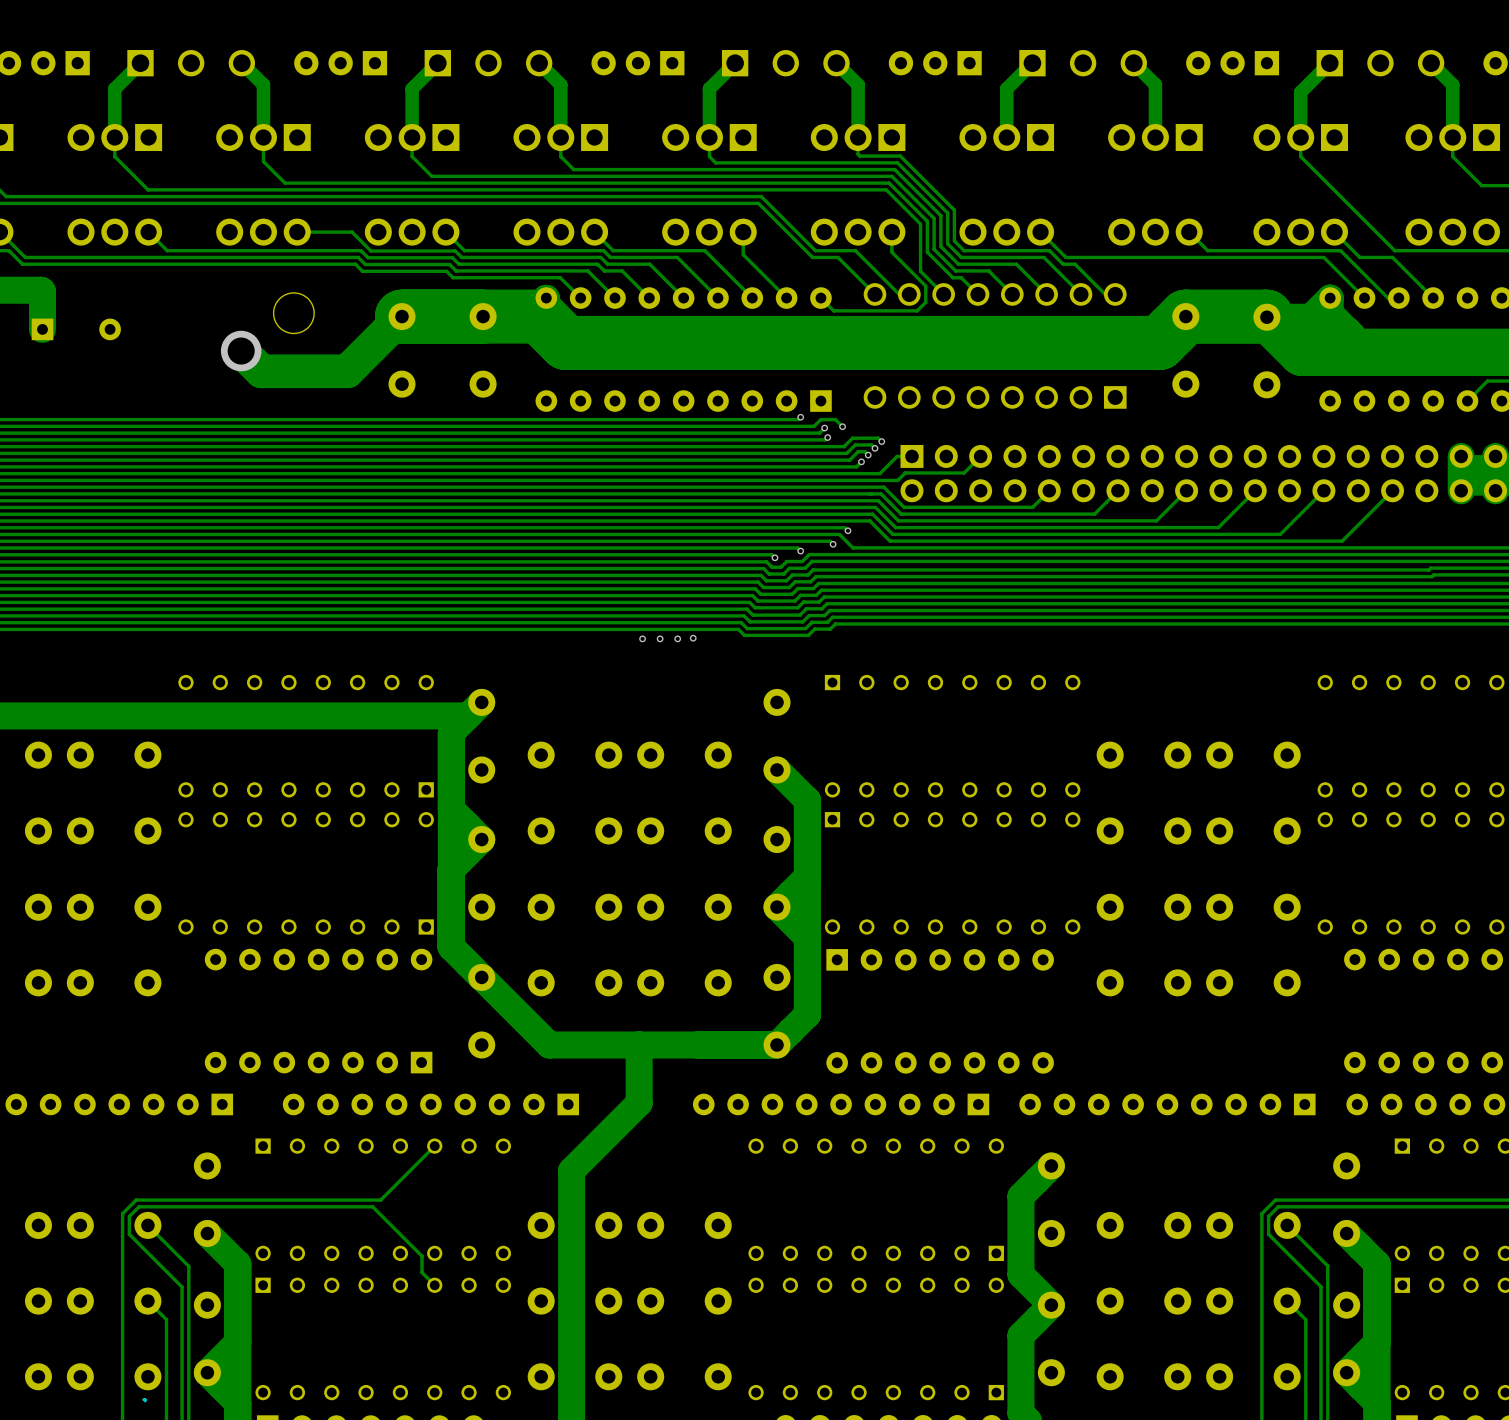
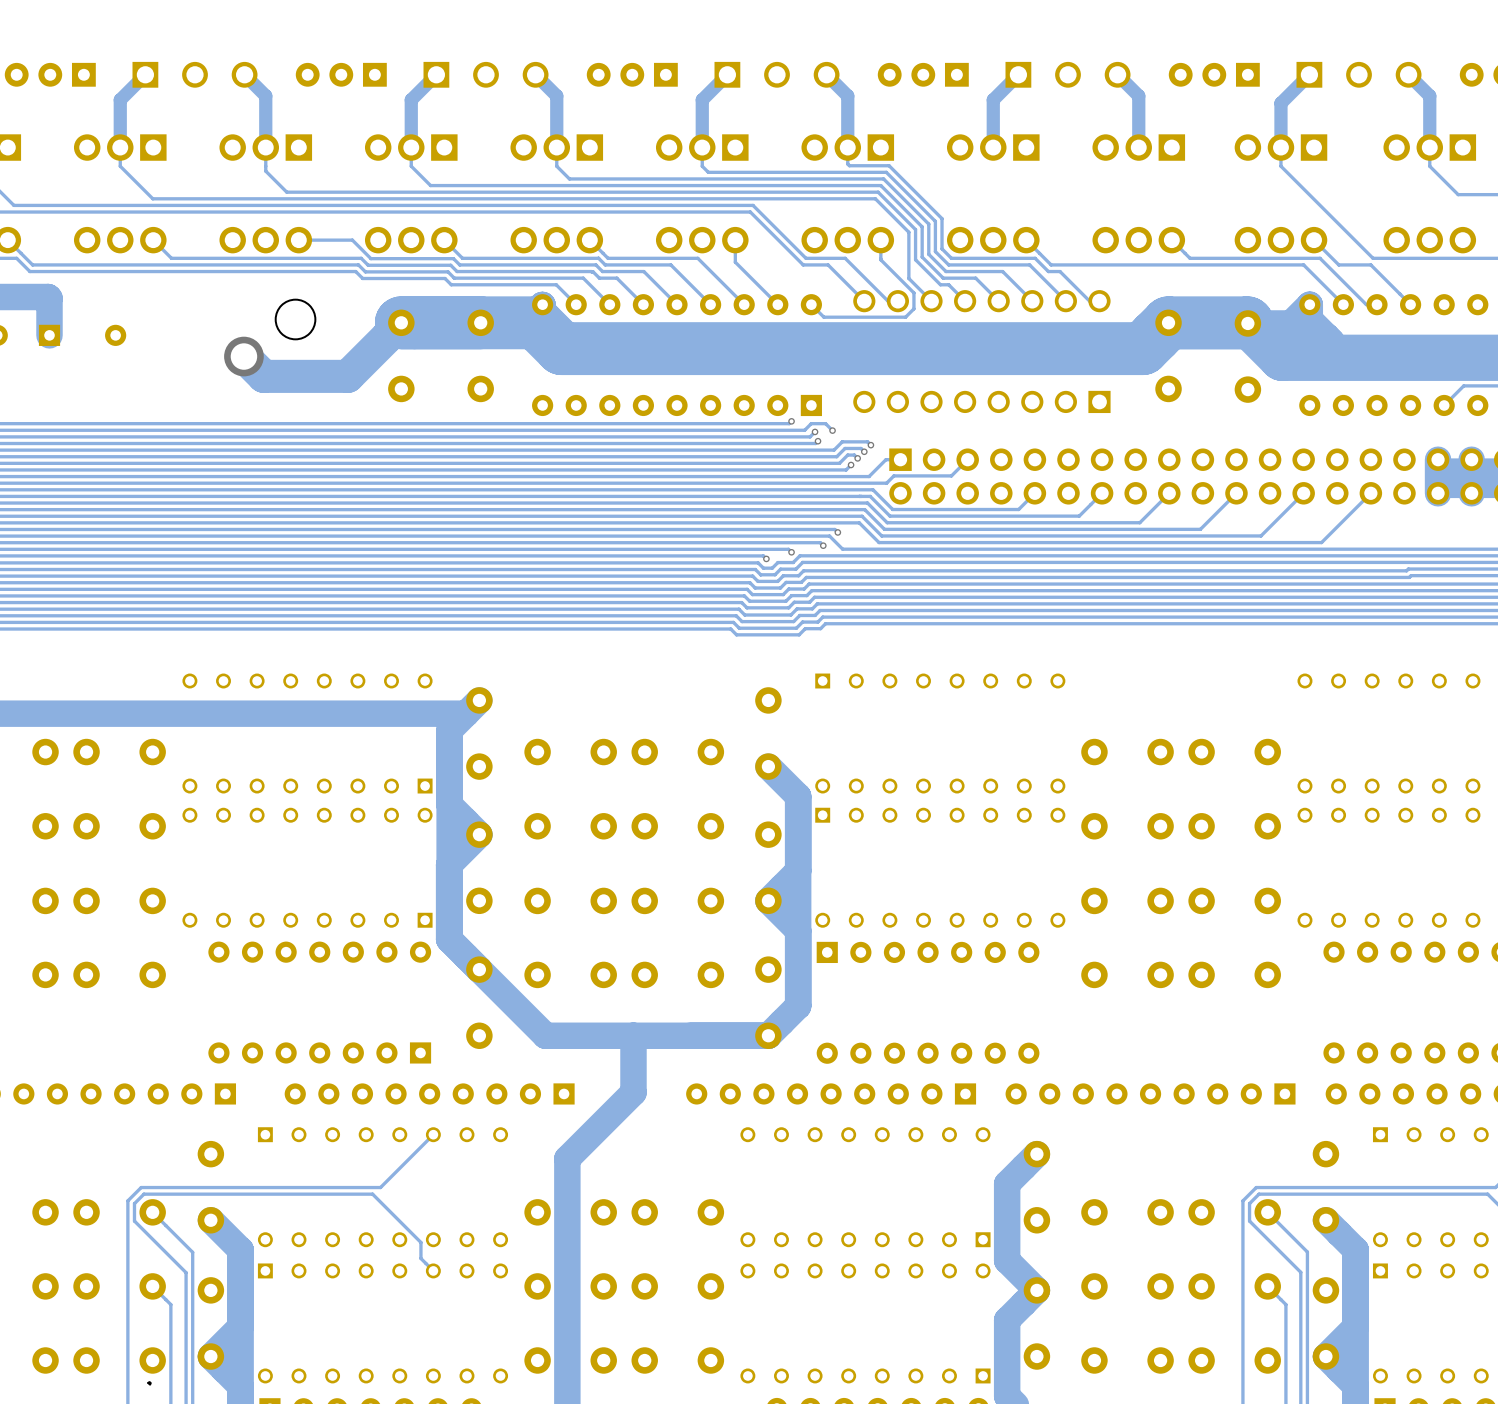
via: (642, 638) -> none
via: (660, 638) -> none
via: (677, 638) -> none
via: (693, 638) -> none

